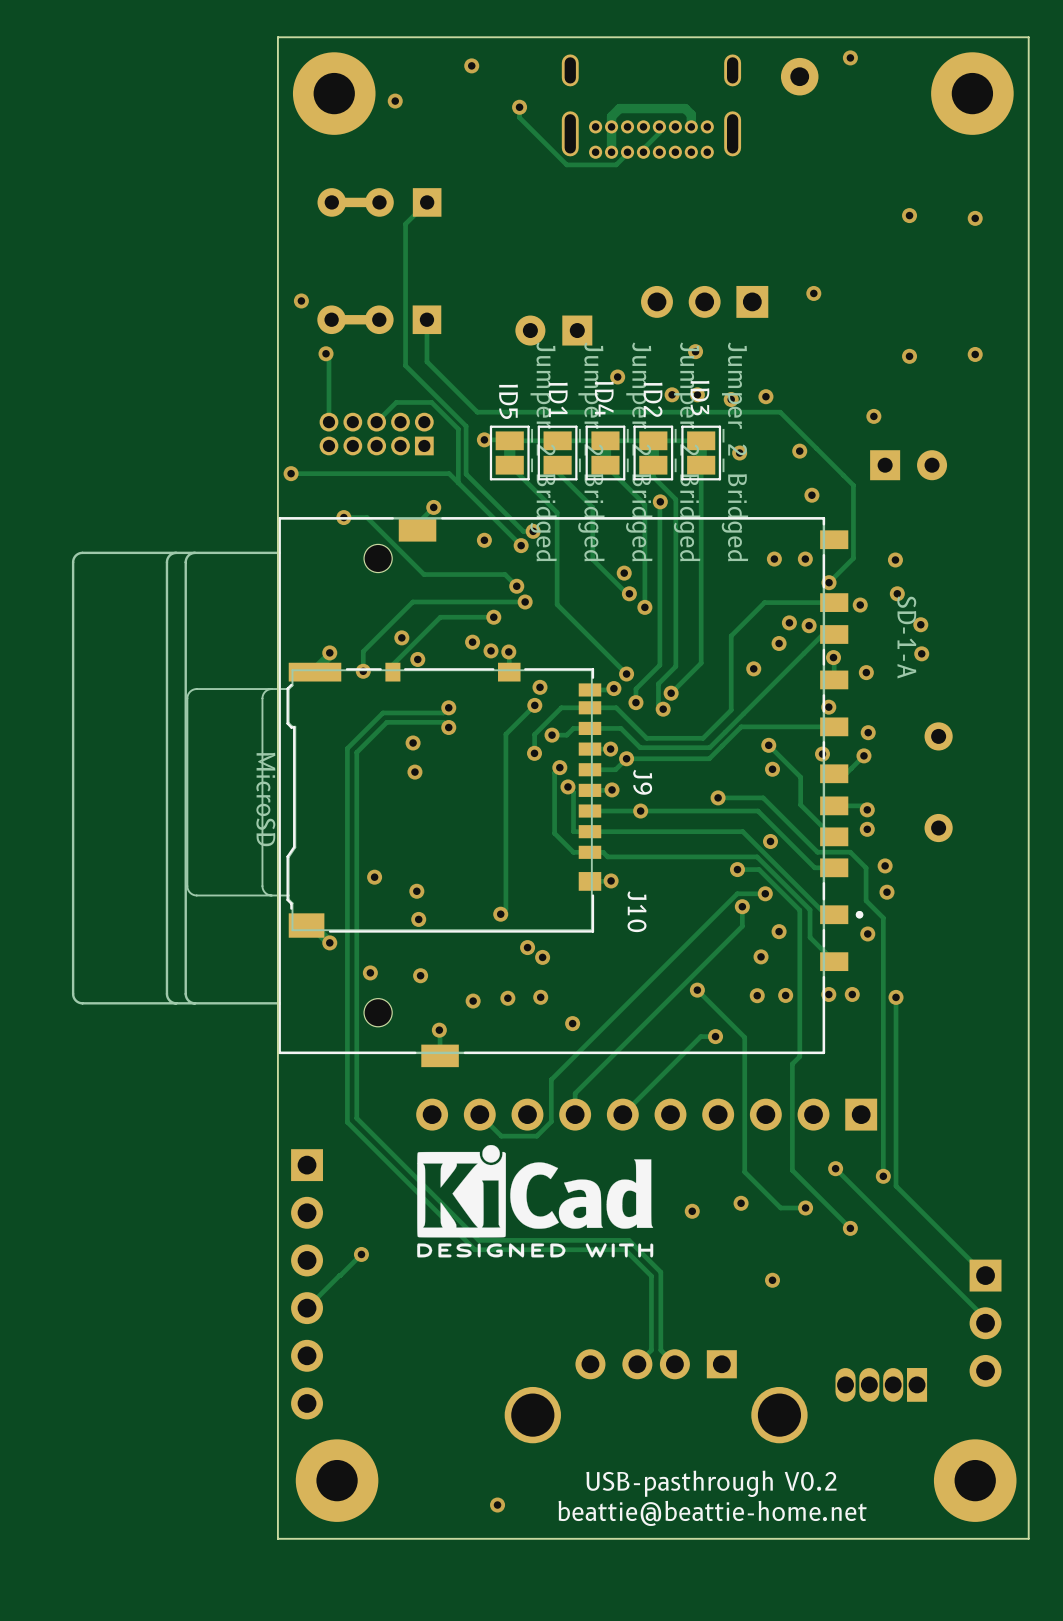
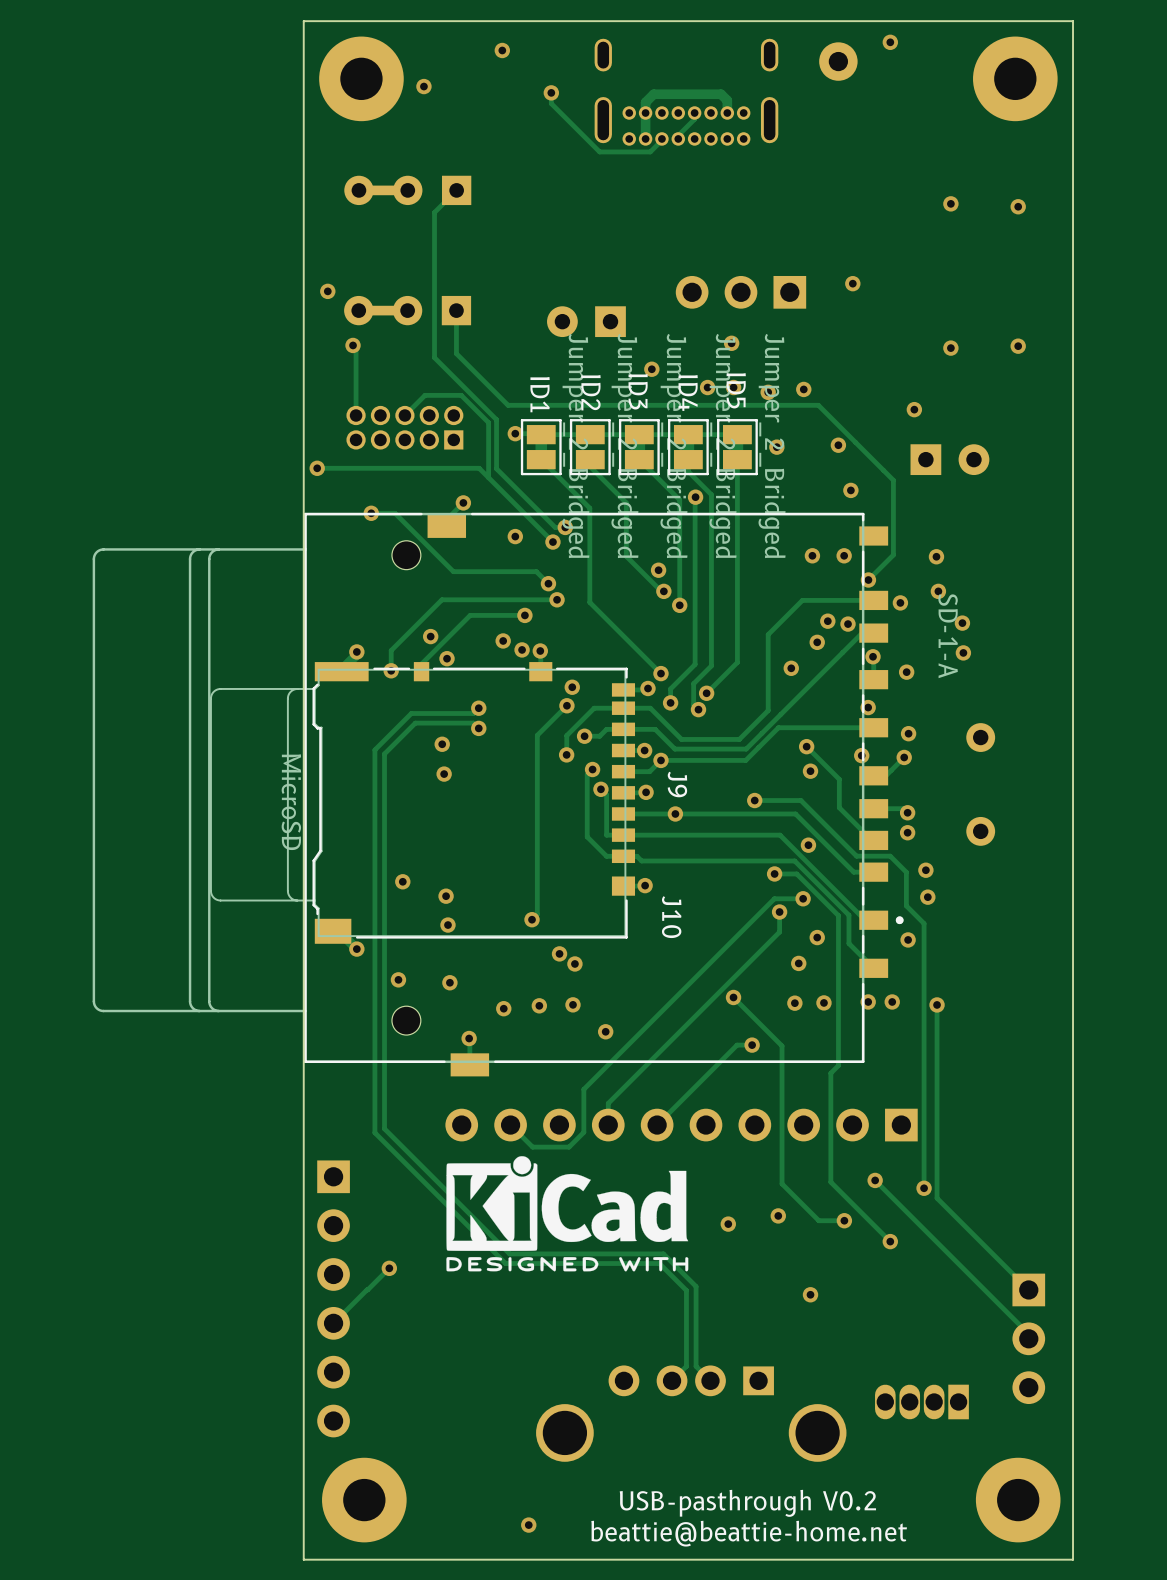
ID3 name: ID3 (700, 398) -> ID5 (736, 390)
ID1 name: ID1 (558, 399) -> ID2 (591, 392)
ID4 name: ID4 (604, 399) -> ID3 (638, 391)
ID2 name: ID2 (653, 399) -> ID4 (688, 393)
ID5 name: ID5 (508, 401) -> ID1 (540, 394)

